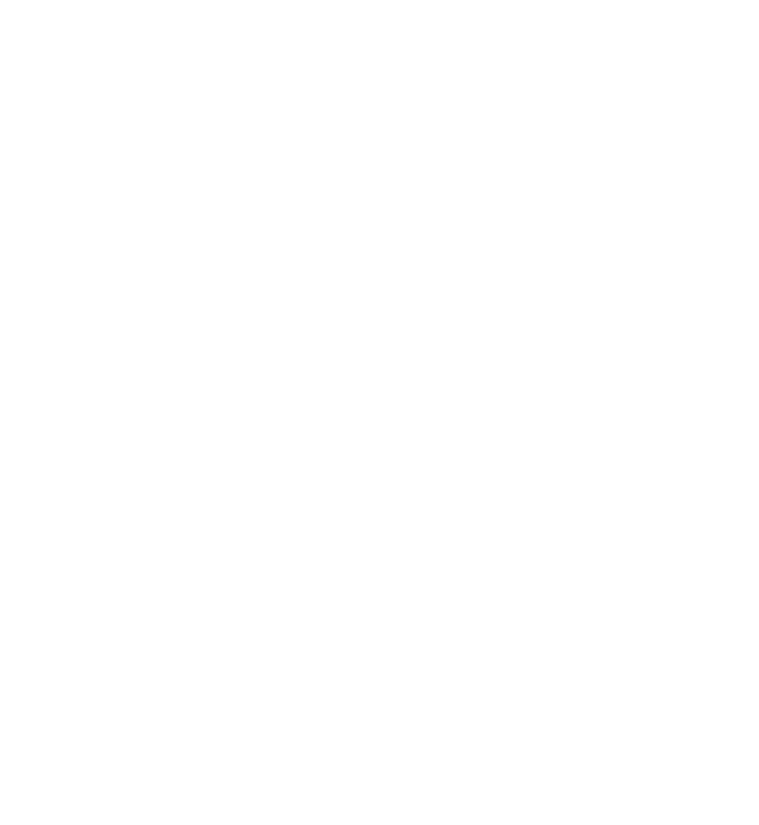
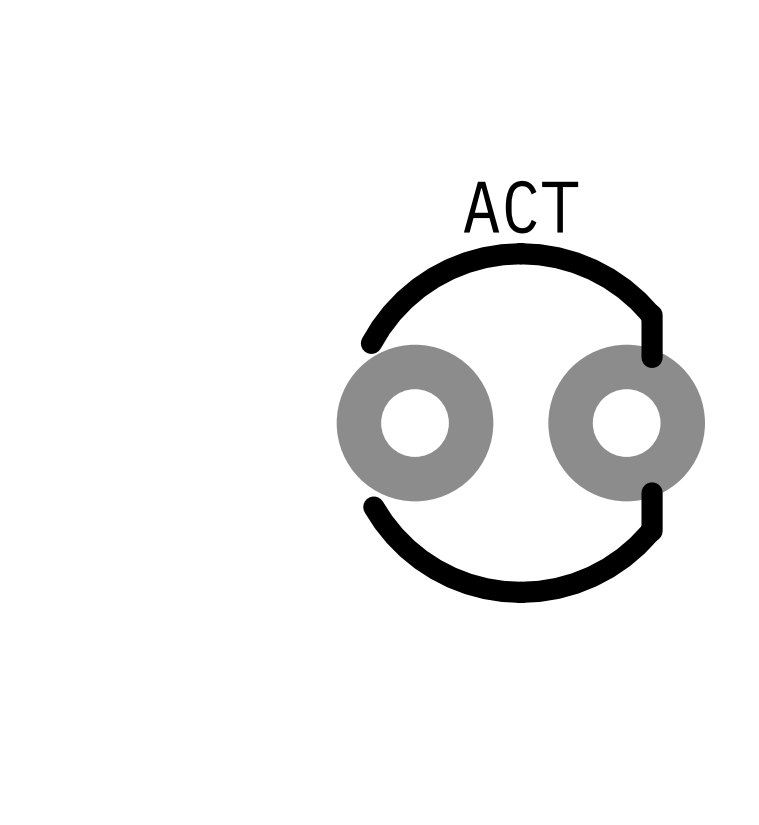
ACT: none -> (520, 423)

